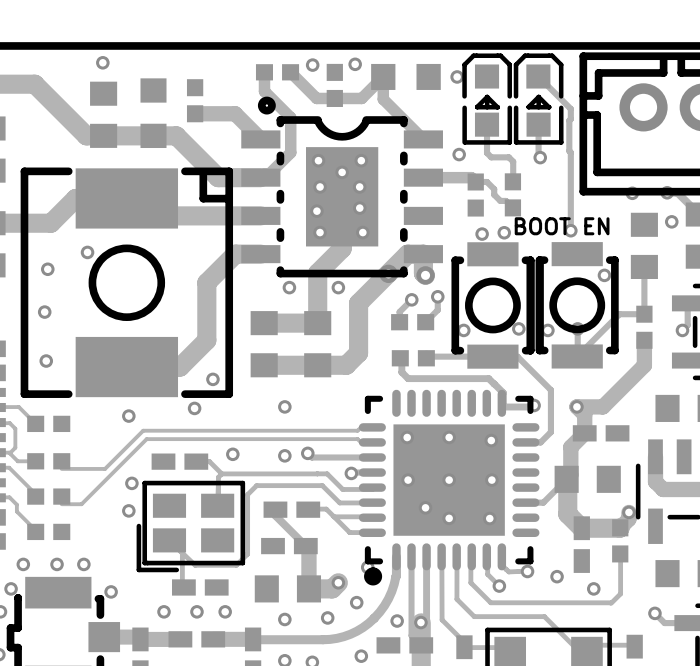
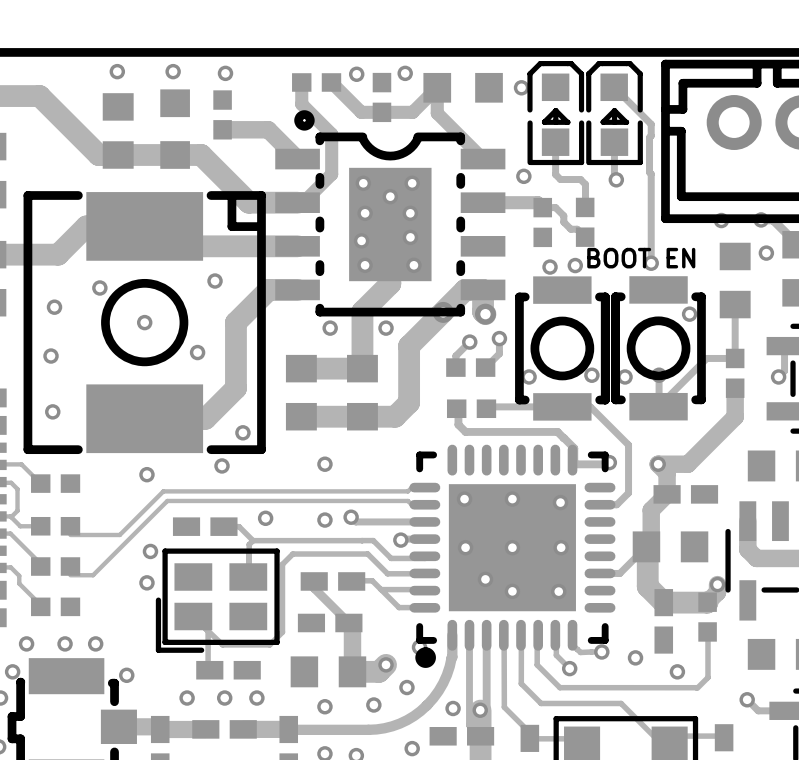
via: none -> (173, 71)
via: none -> (225, 73)
via: none -> (215, 281)
via: none -> (144, 322)
via: none -> (197, 352)

